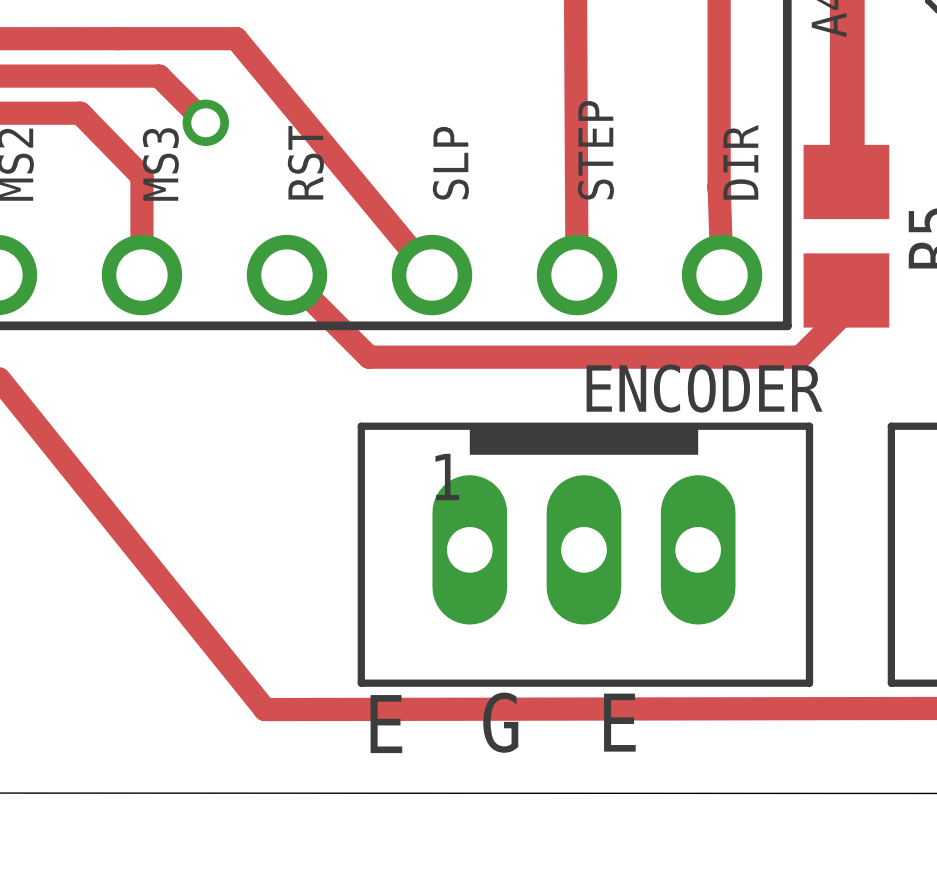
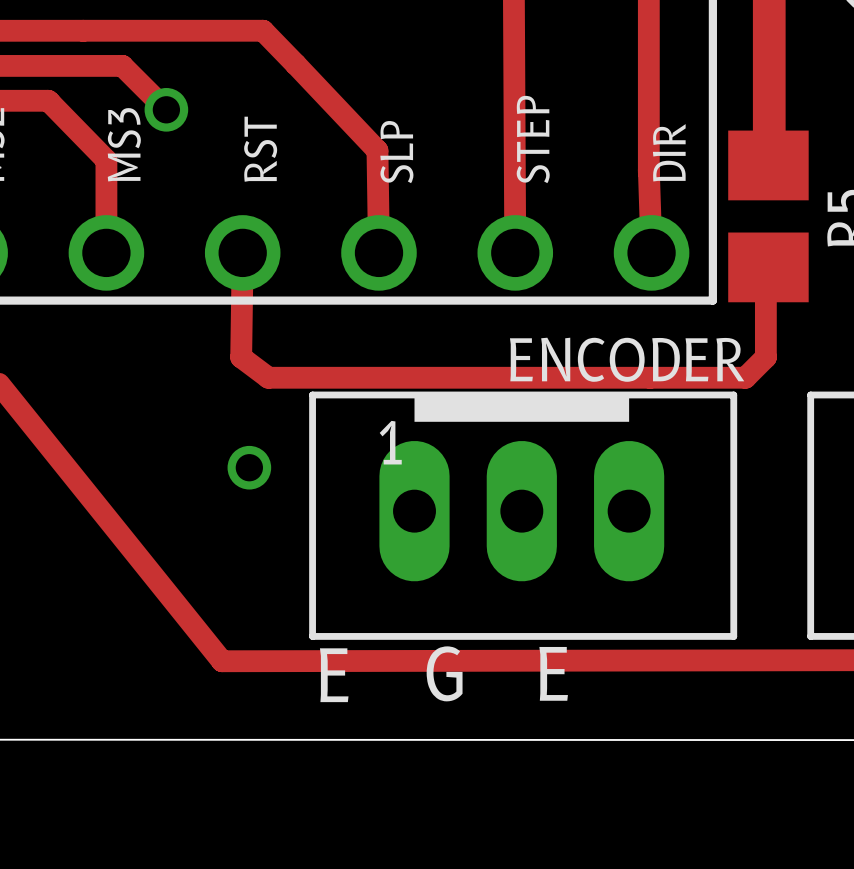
track: (236, 38) (432, 275) -> (195, 30) (263, 30) (377, 150) (378, 252)
track: (286, 275) (369, 357) (800, 357) (860, 296) (846, 290) -> (242, 252) (241, 357) (268, 377) (745, 377) (765, 357) (765, 269) (768, 267)
via: none -> (249, 467)

